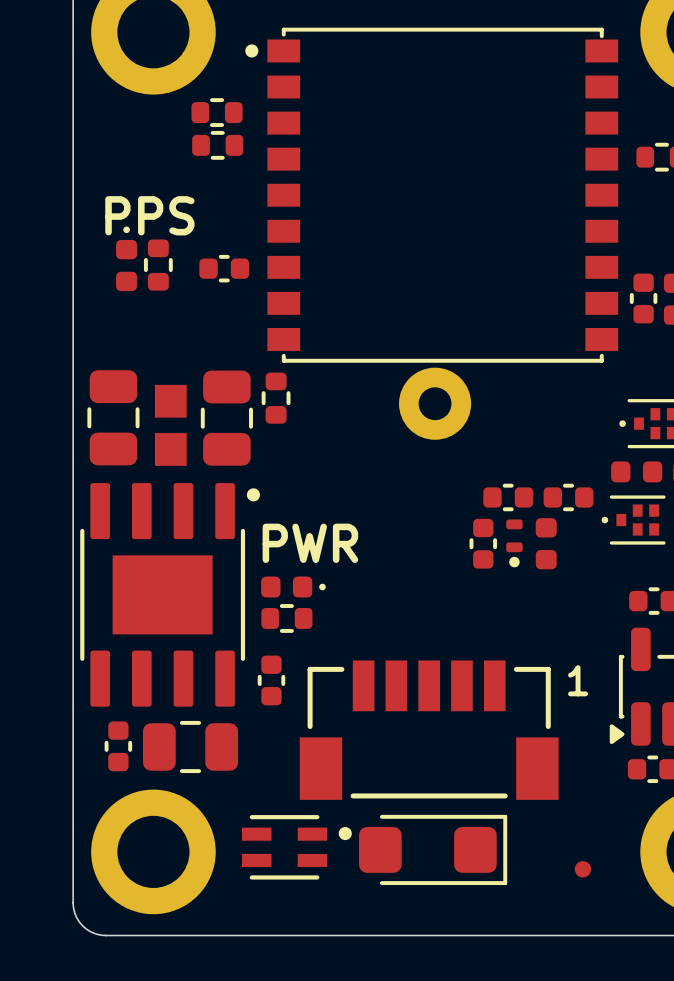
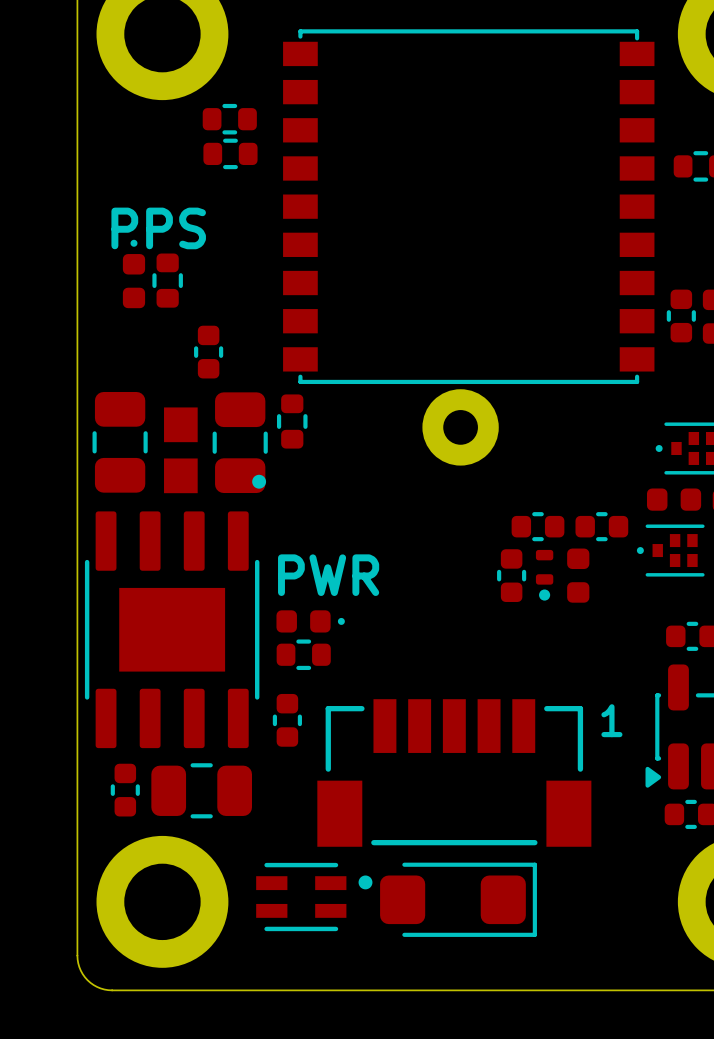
part footprint: [245, 27, 619, 363] -> [283, 29, 655, 385]
part rotation: 0° (224, 268) -> 90° clockwise (208, 352)
part position: (224, 268) -> (208, 352)
part footprint: [80, 483, 261, 707] -> [84, 474, 267, 749]
part: (582, 869) -> none

